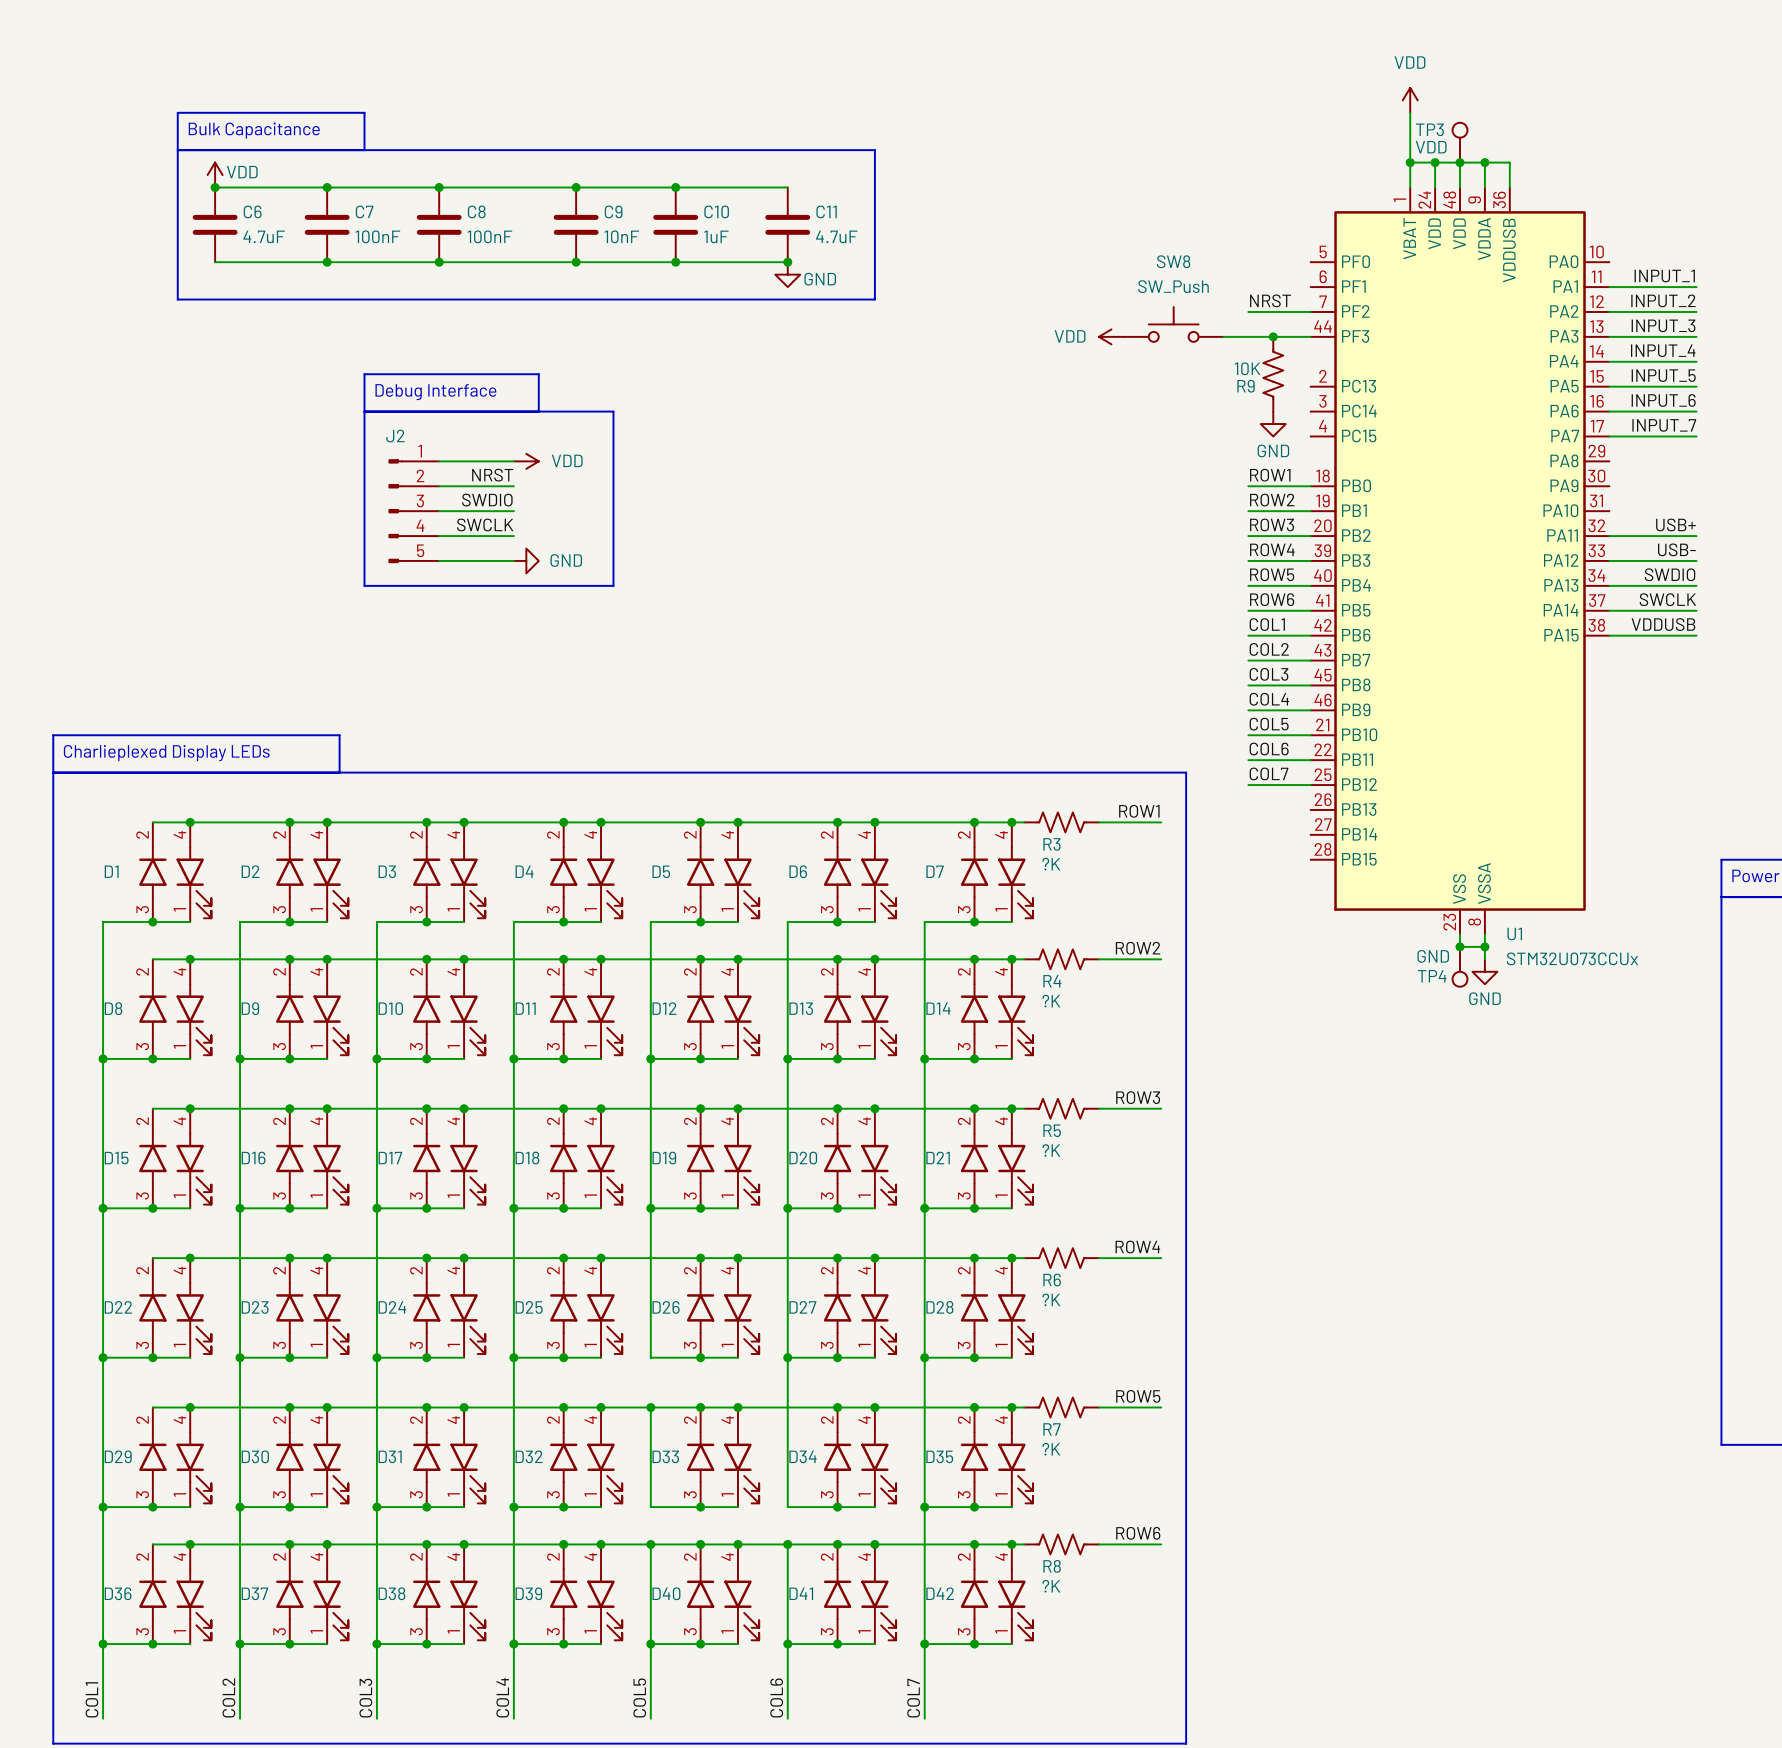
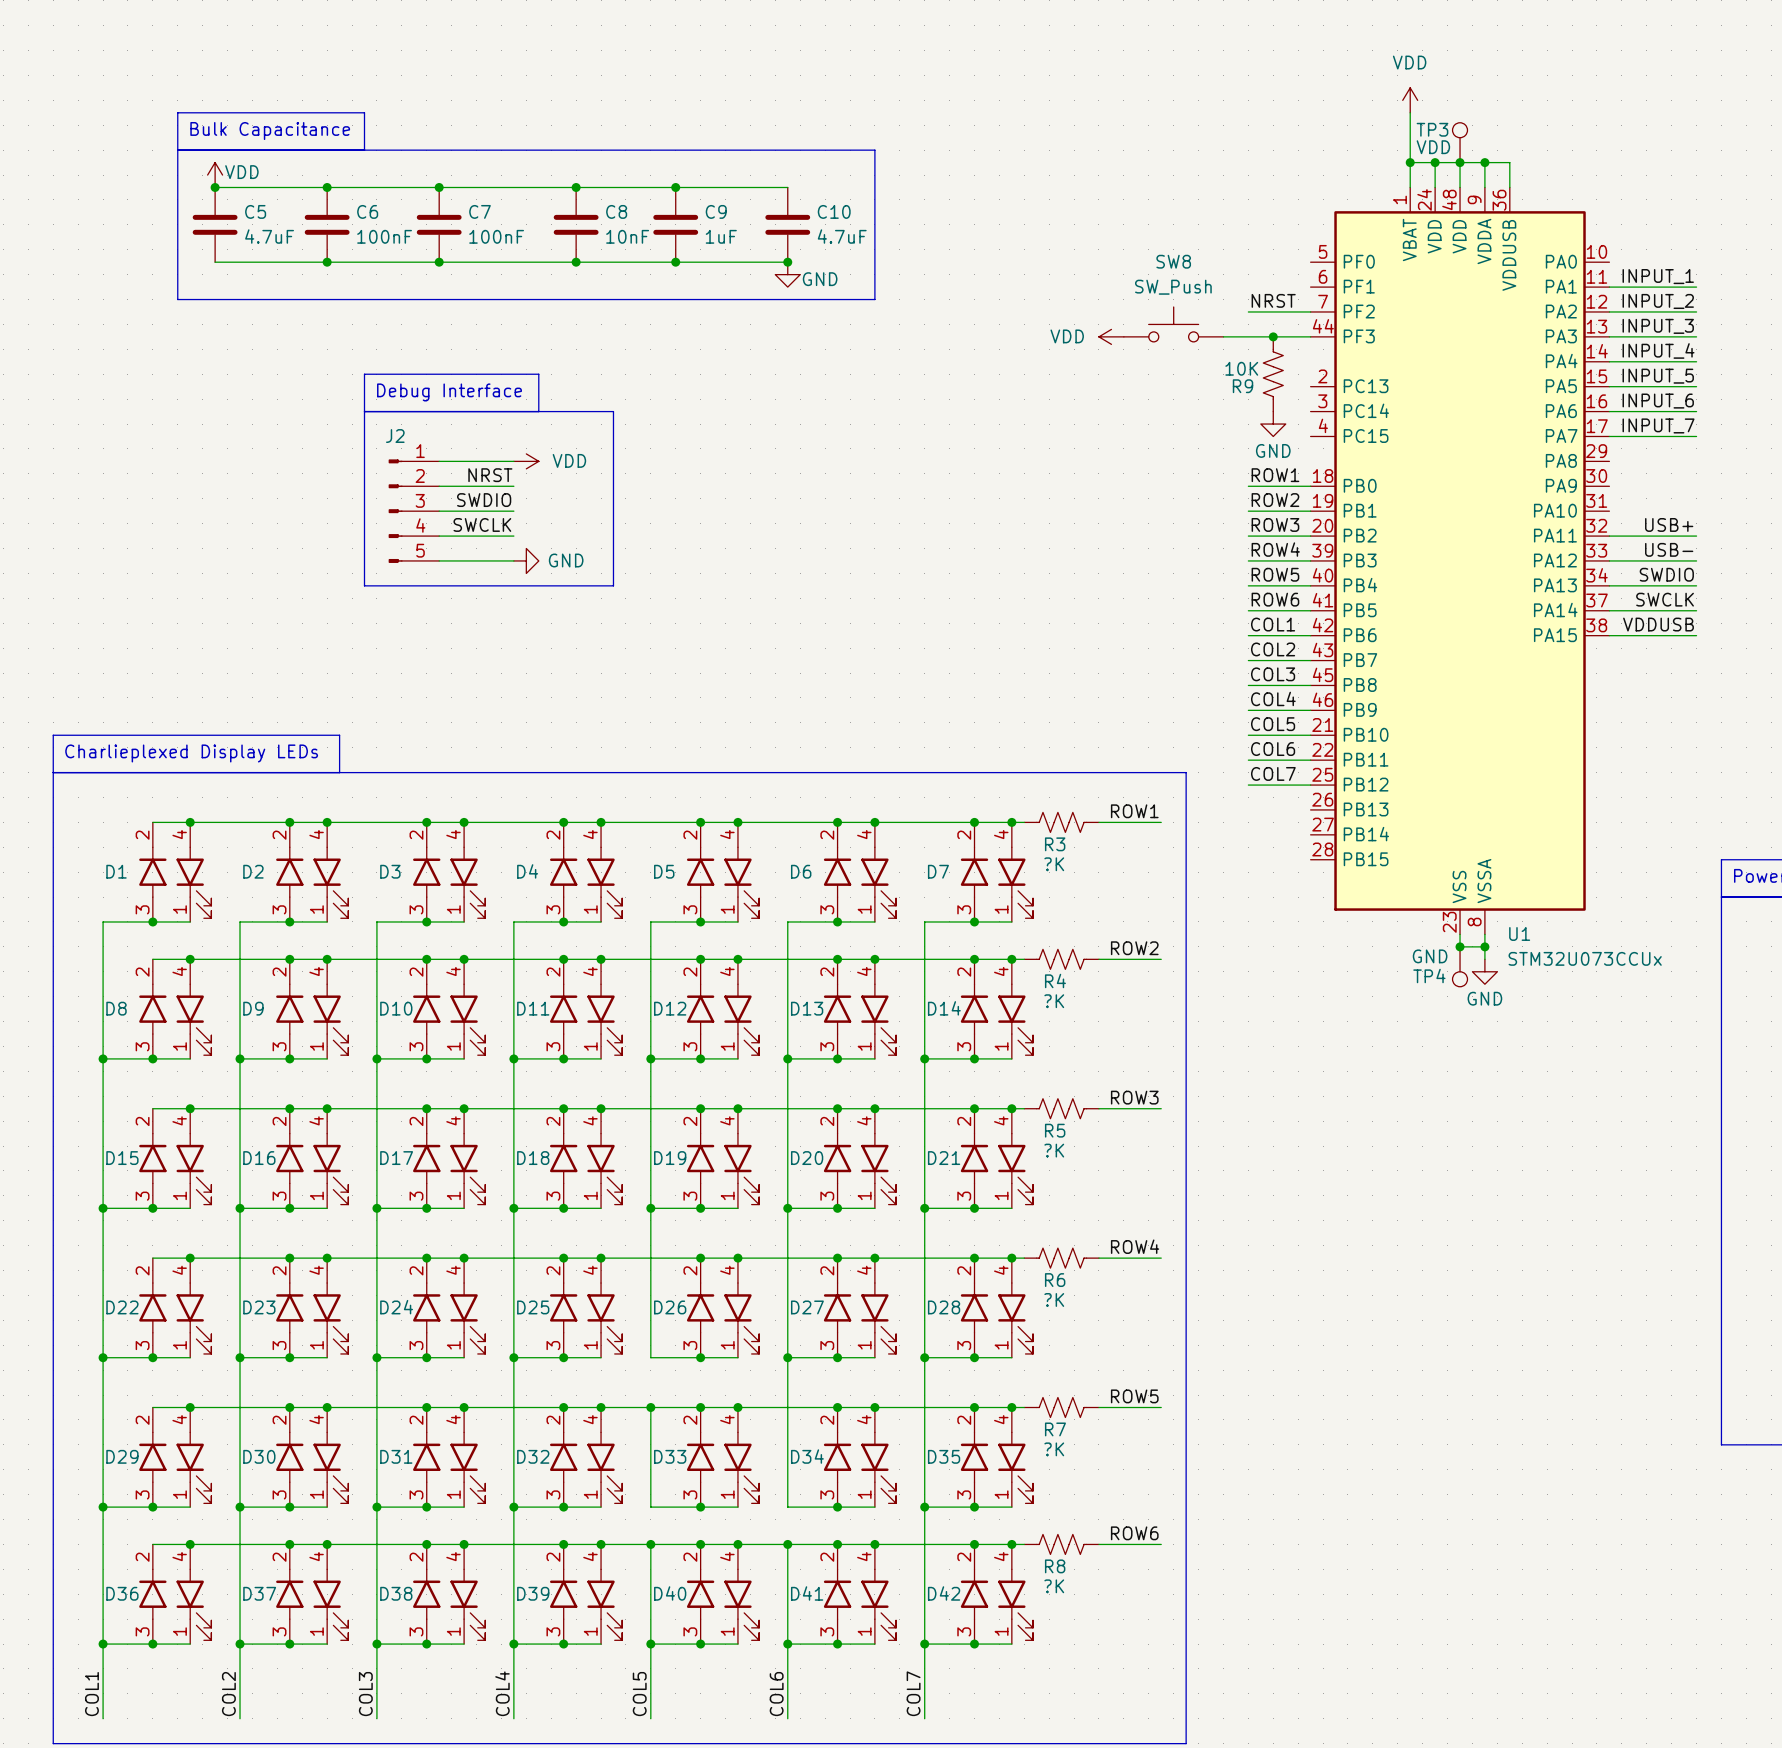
C6 name: C6 (252, 211) -> C5 (255, 211)
C7 name: C7 (364, 211) -> C6 (367, 211)
C8 name: C8 (476, 211) -> C7 (480, 211)
C9 name: C9 (613, 211) -> C8 (616, 211)
C10 name: C10 (716, 211) -> C9 (716, 211)
C11 name: C11 (826, 211) -> C10 (834, 211)

